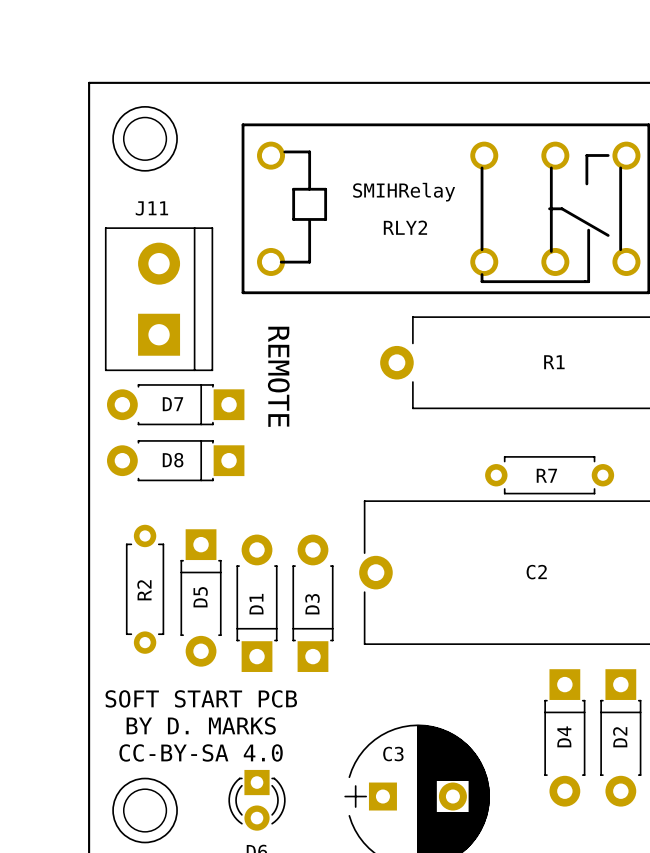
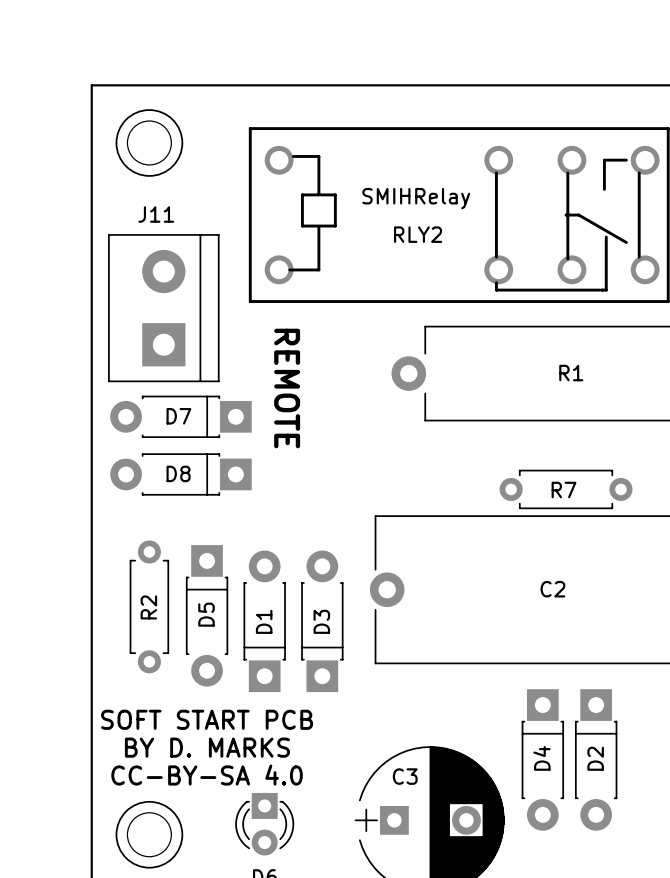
D4 position: (564, 737) -> (542, 759)
D2 position: (620, 737) -> (596, 759)

